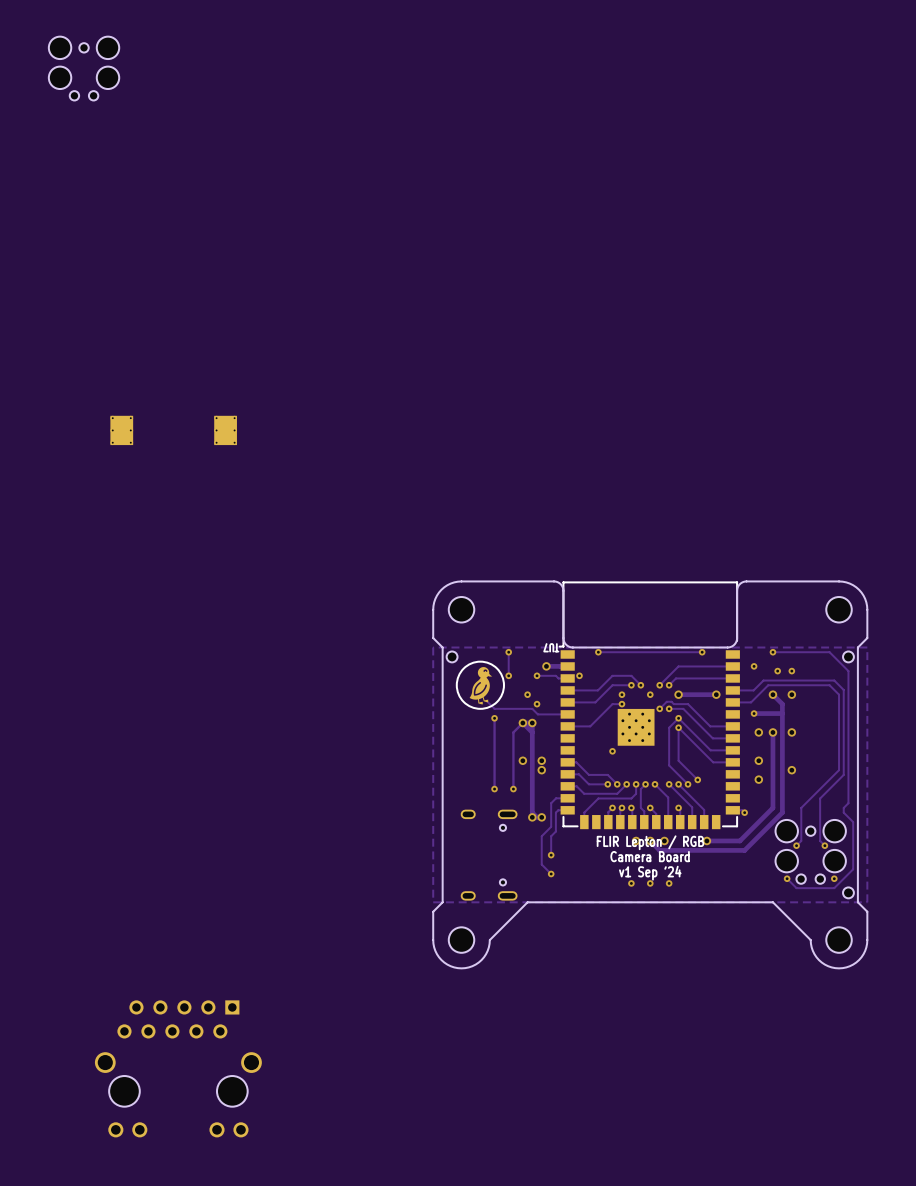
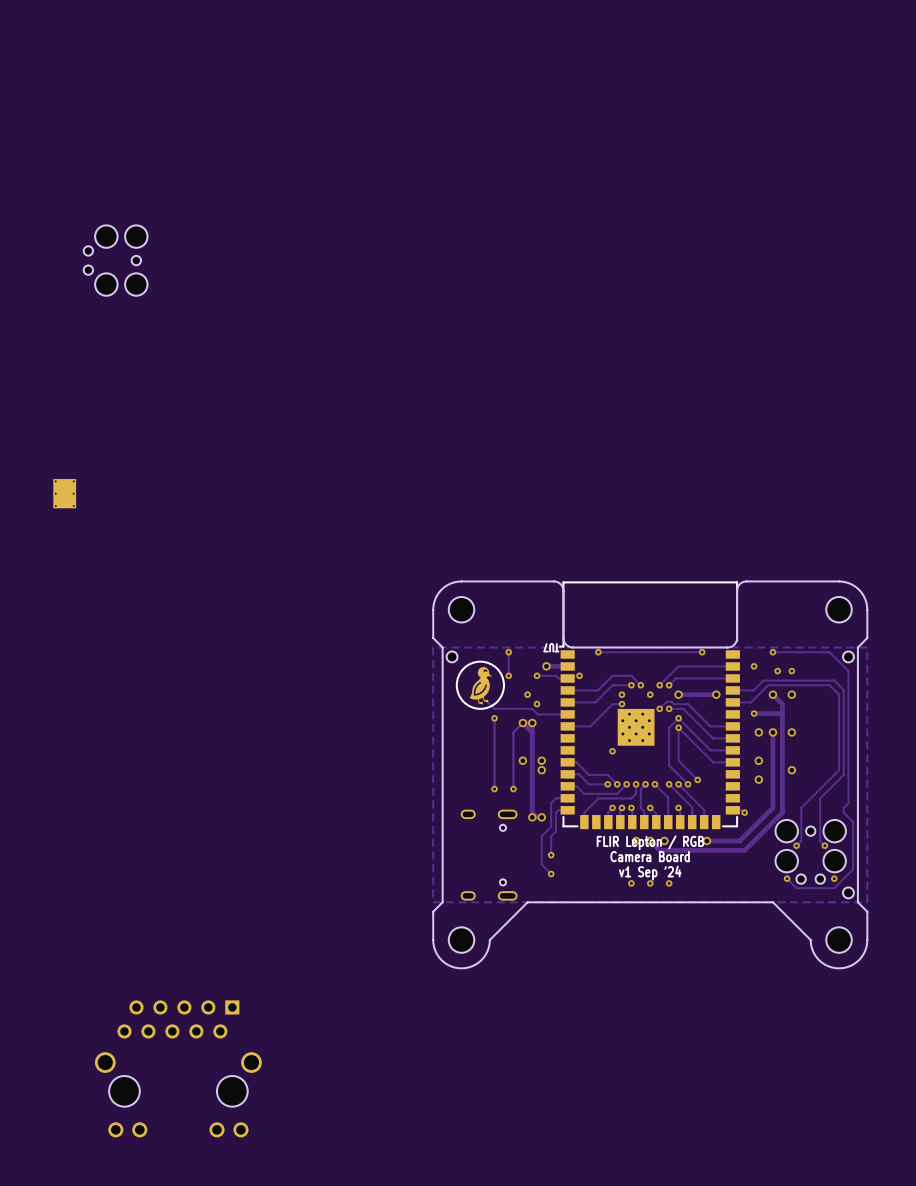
part rotation: 0° (84, 68) -> 90° clockwise (115, 260)
part position: (84, 68) -> (115, 260)
part position: (121, 430) -> (64, 493)
part: (225, 430) -> none

